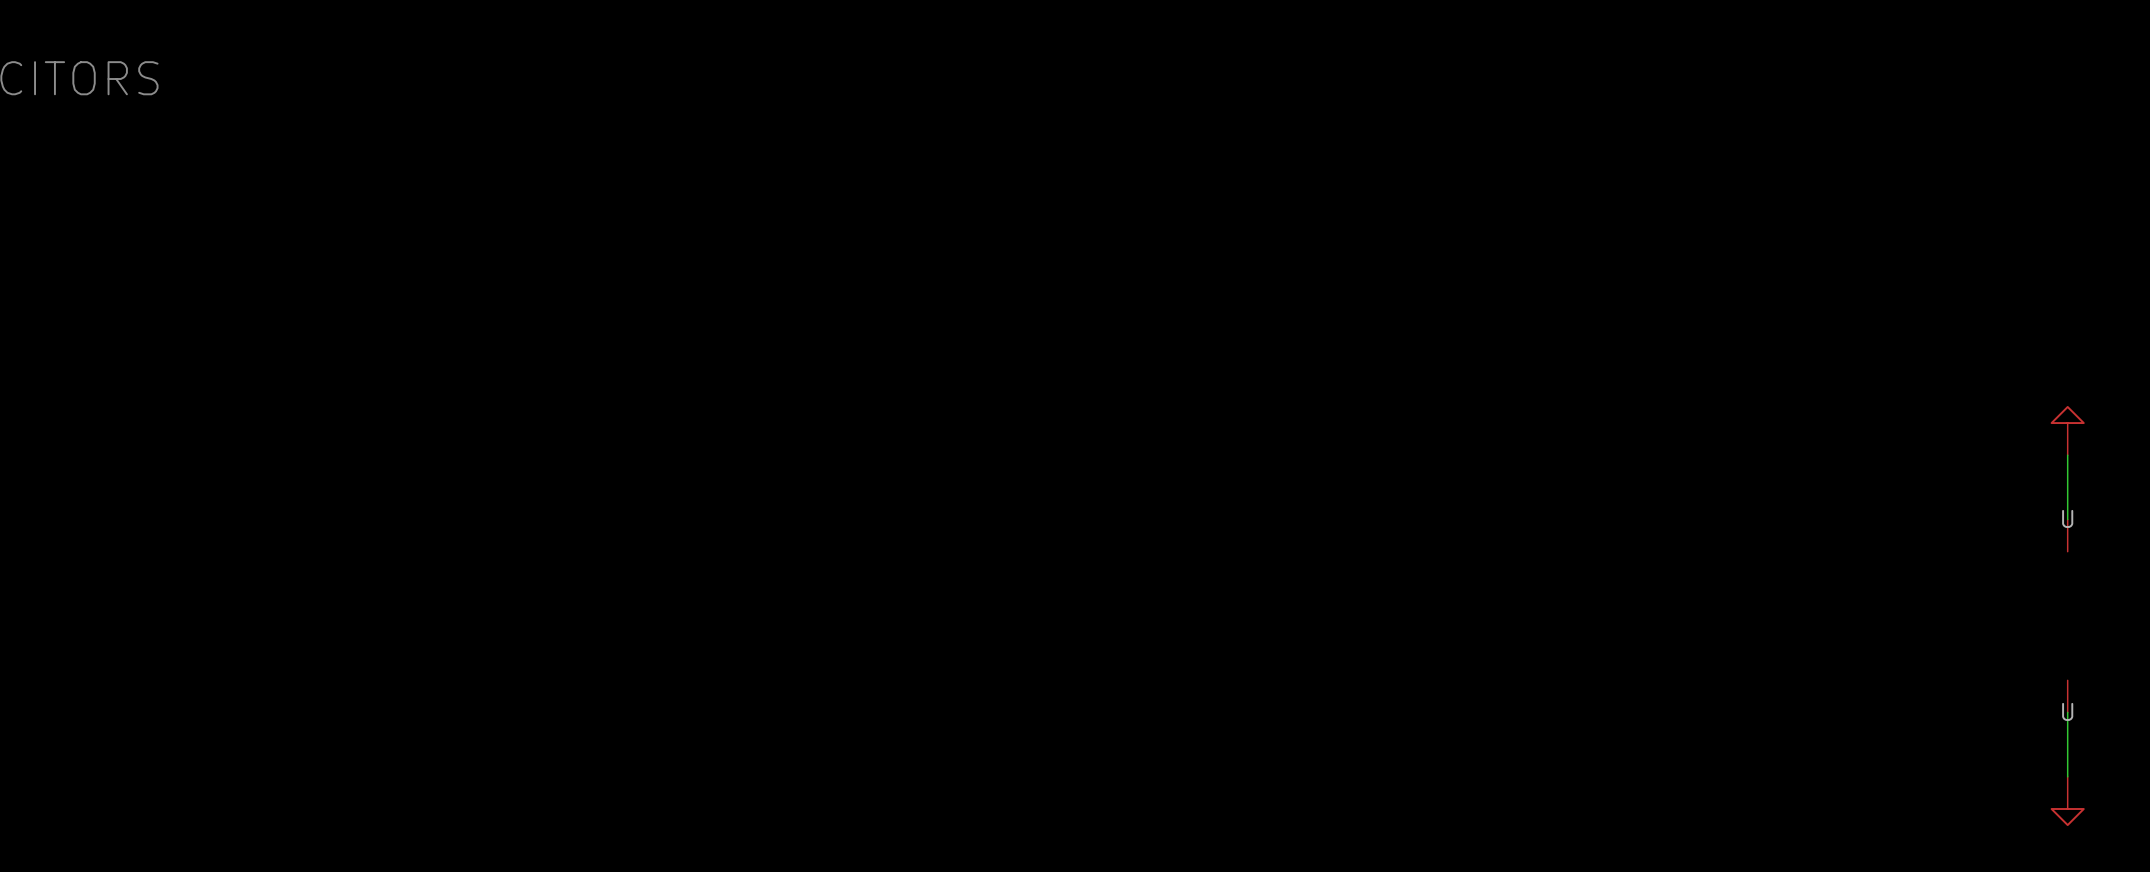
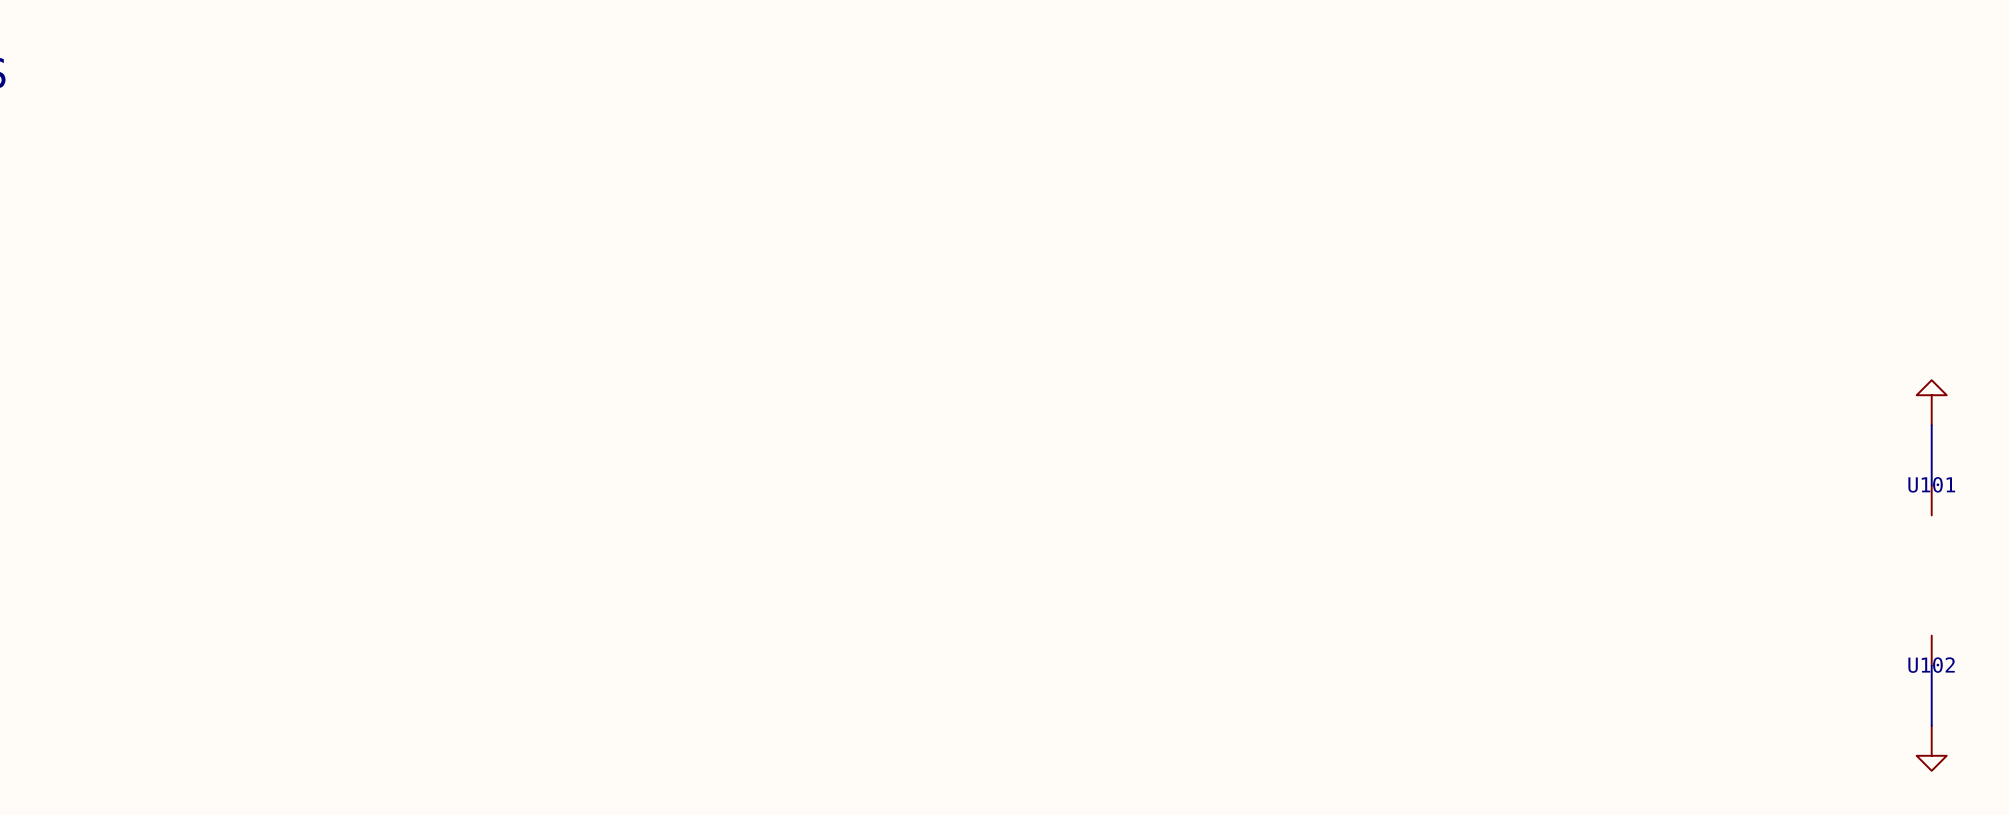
U name: U (2067, 518) -> U101 (1931, 484)
U name: U (2067, 711) -> U102 (1931, 665)

